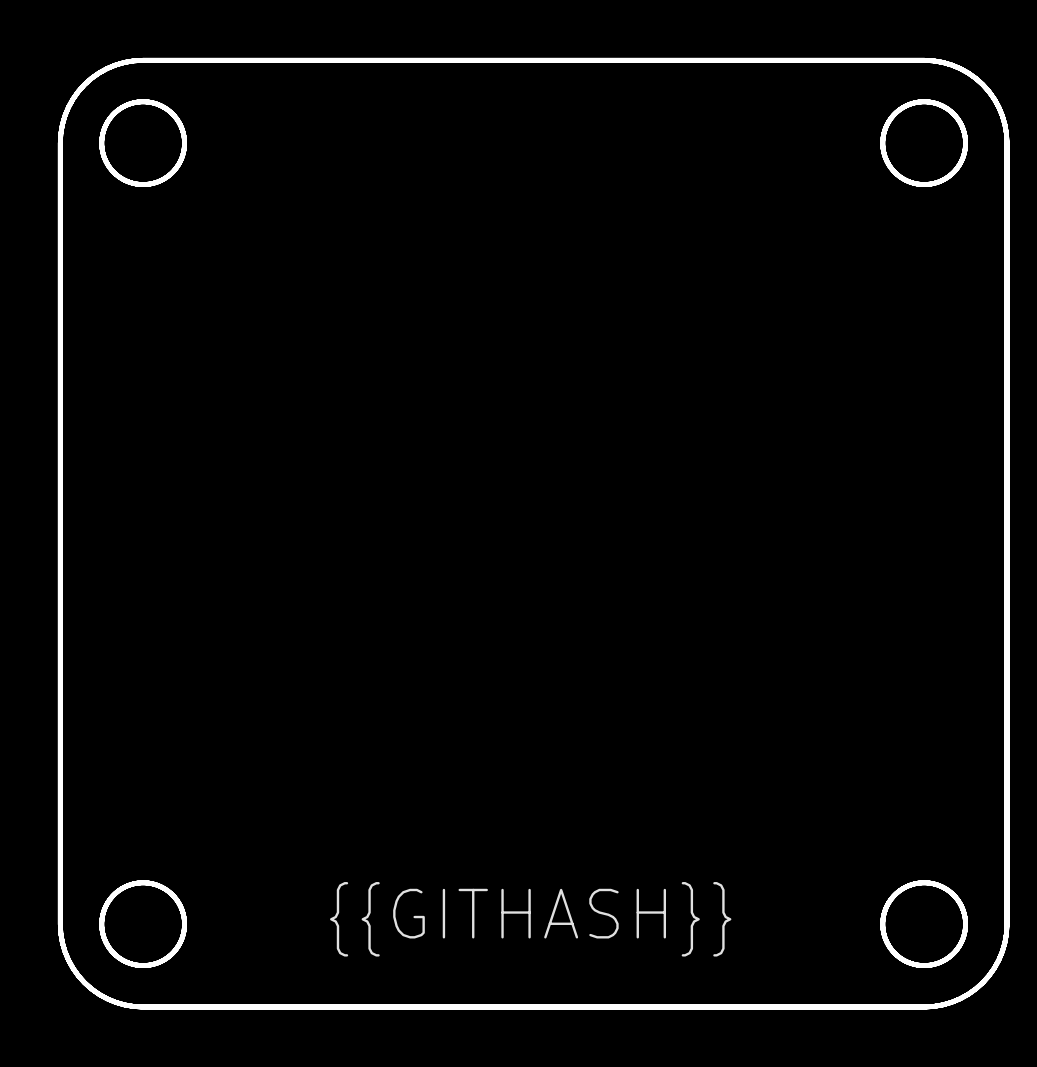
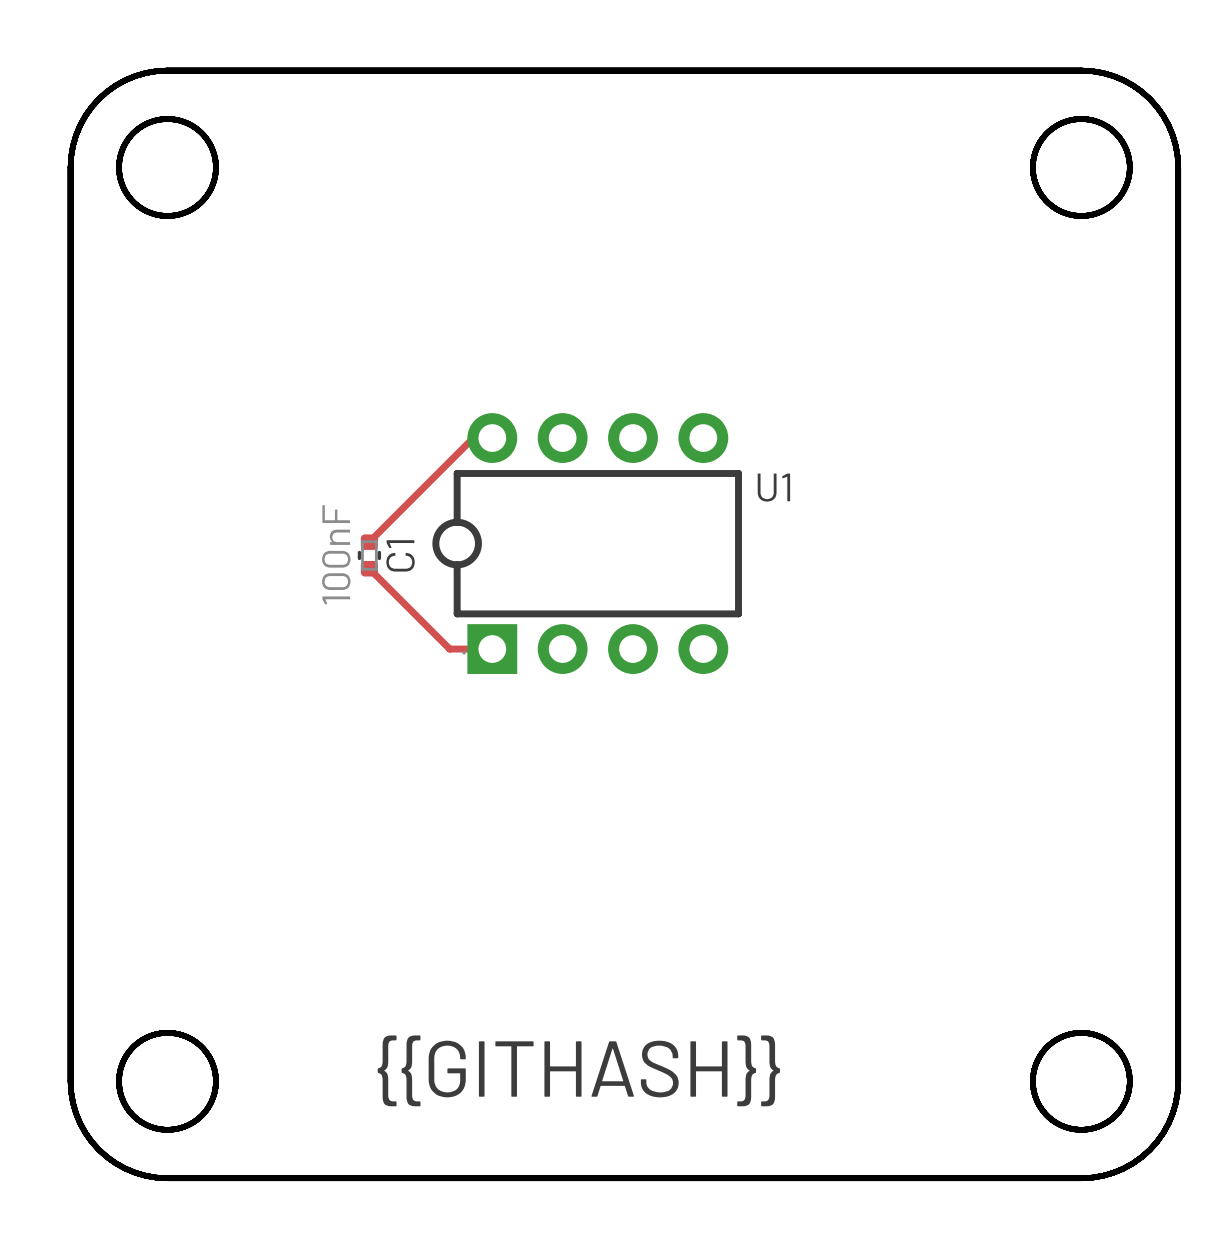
top track: none -> (492, 438) (473, 438) (369, 541)
U1: none -> (587, 543)
C1: none -> 100nF (369, 555)
top track: none -> (369, 568) (449, 649) (492, 649)

